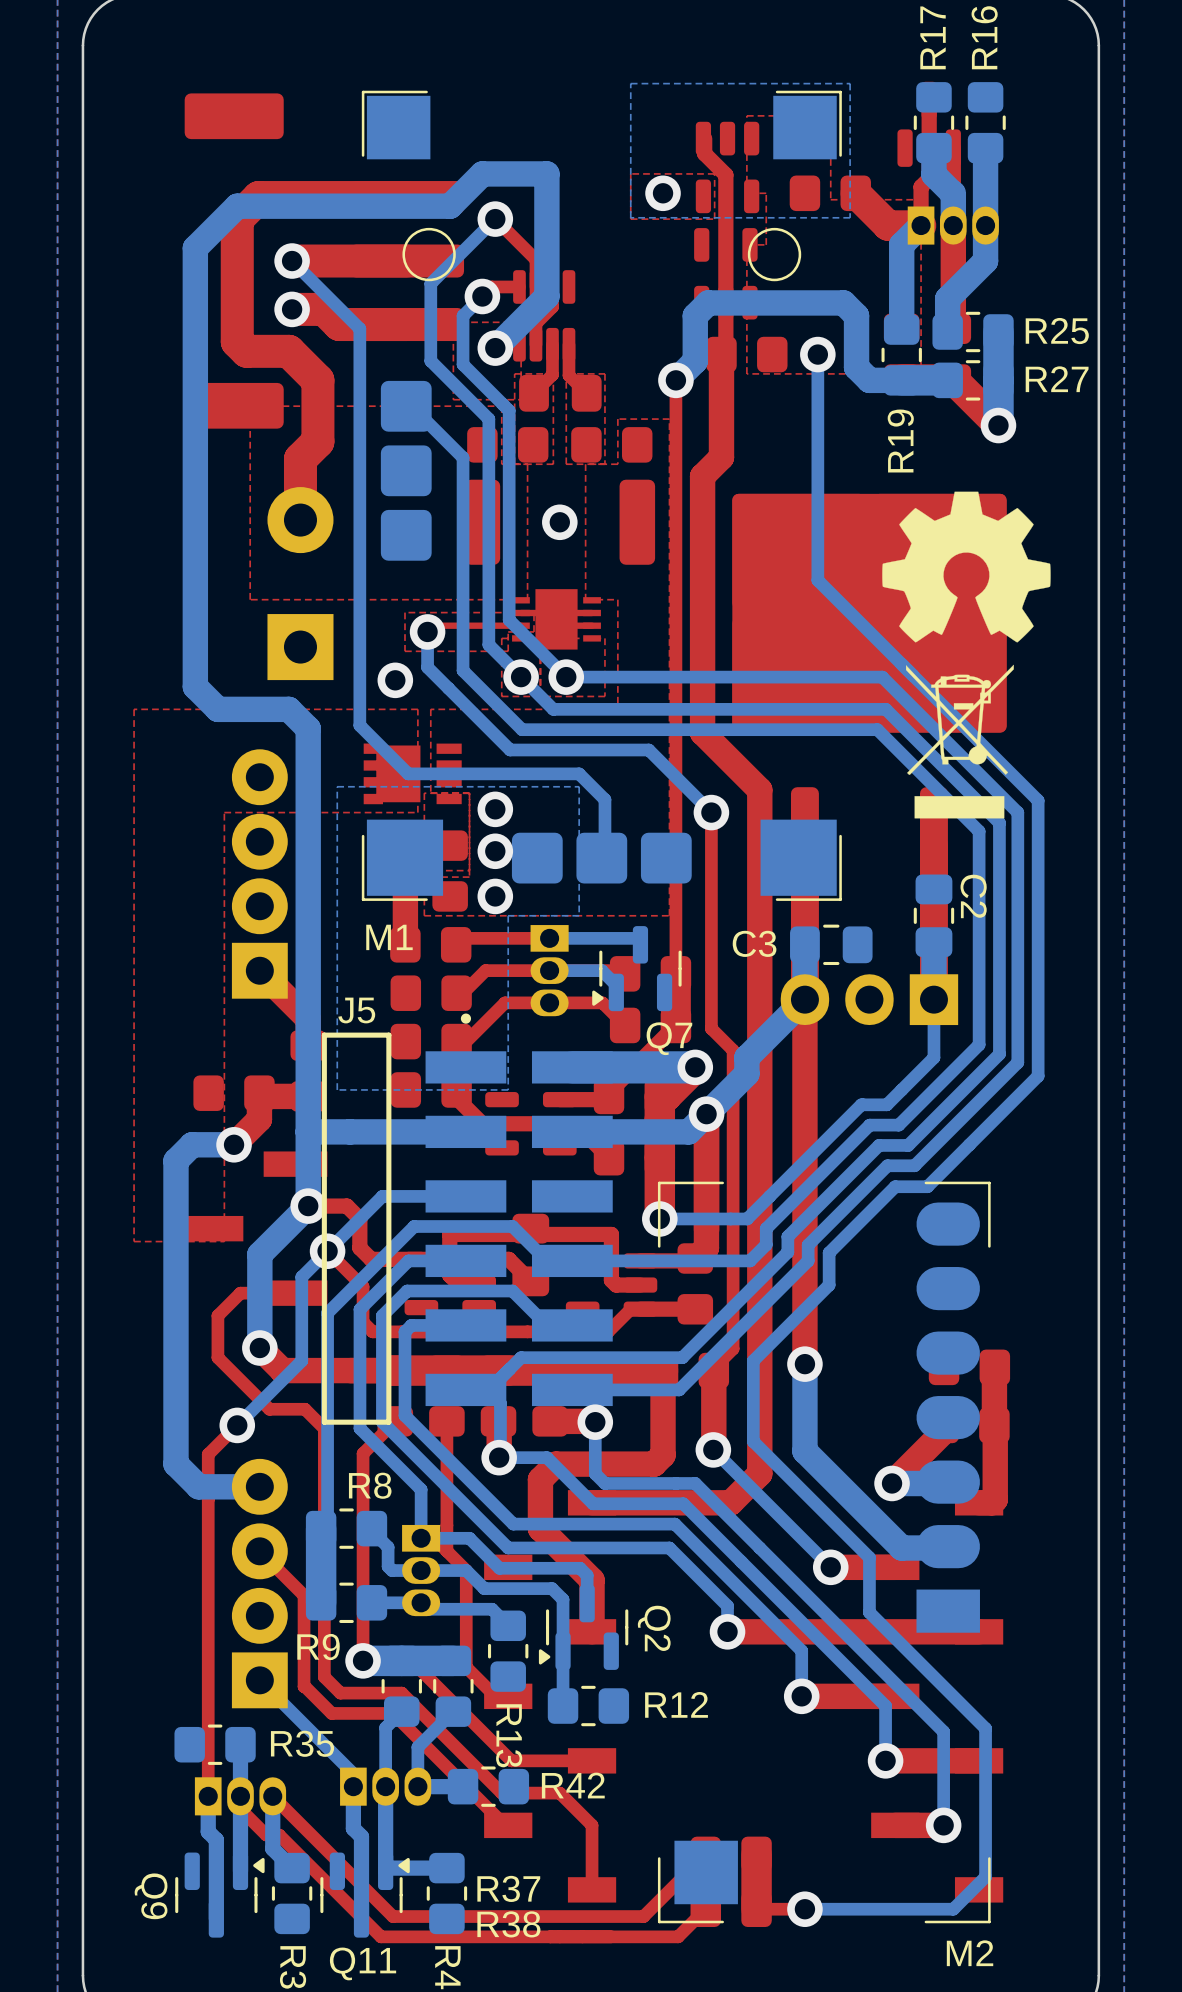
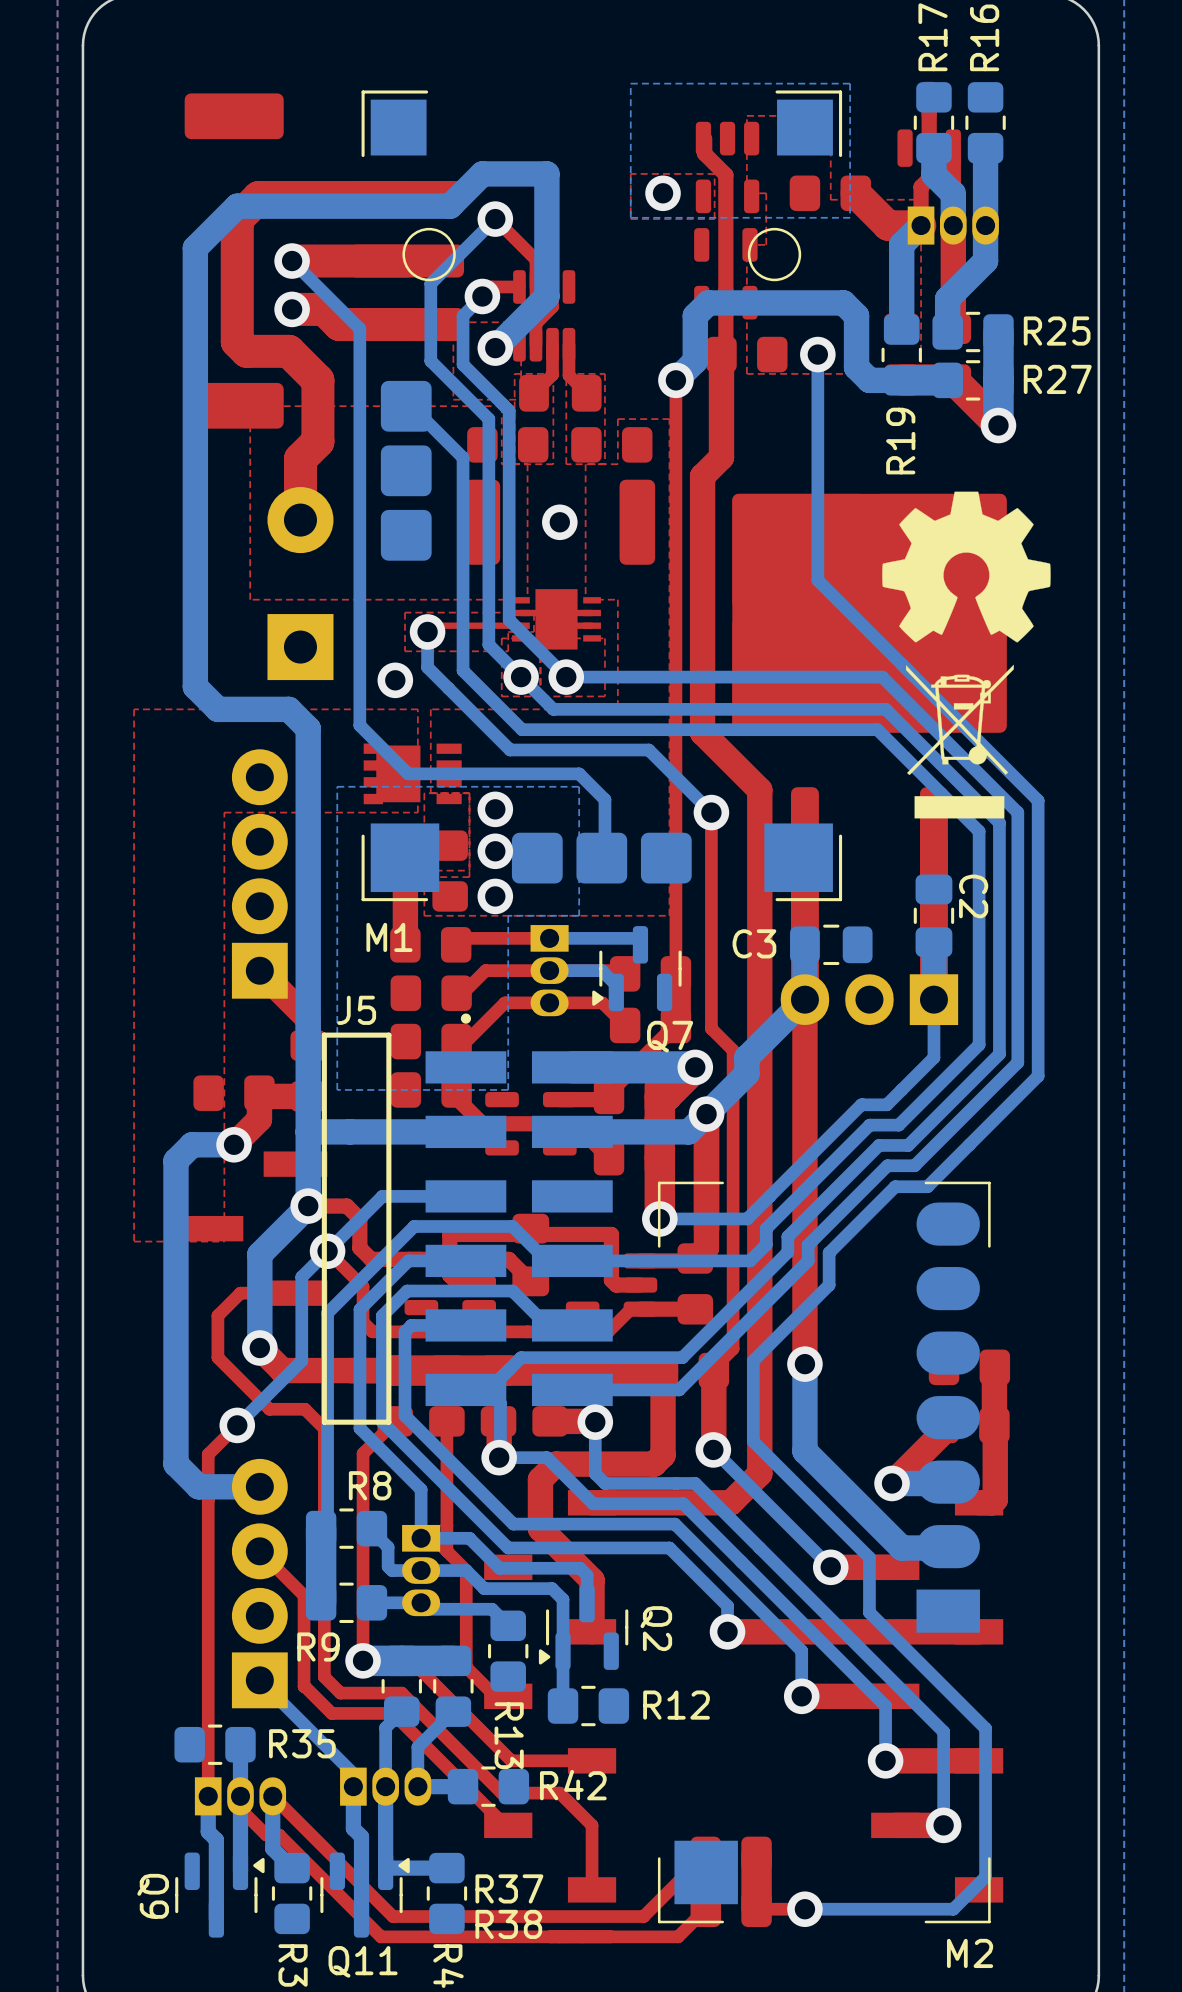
M1 footprint: [361, 90, 842, 901] -> [361, 90, 843, 902]

